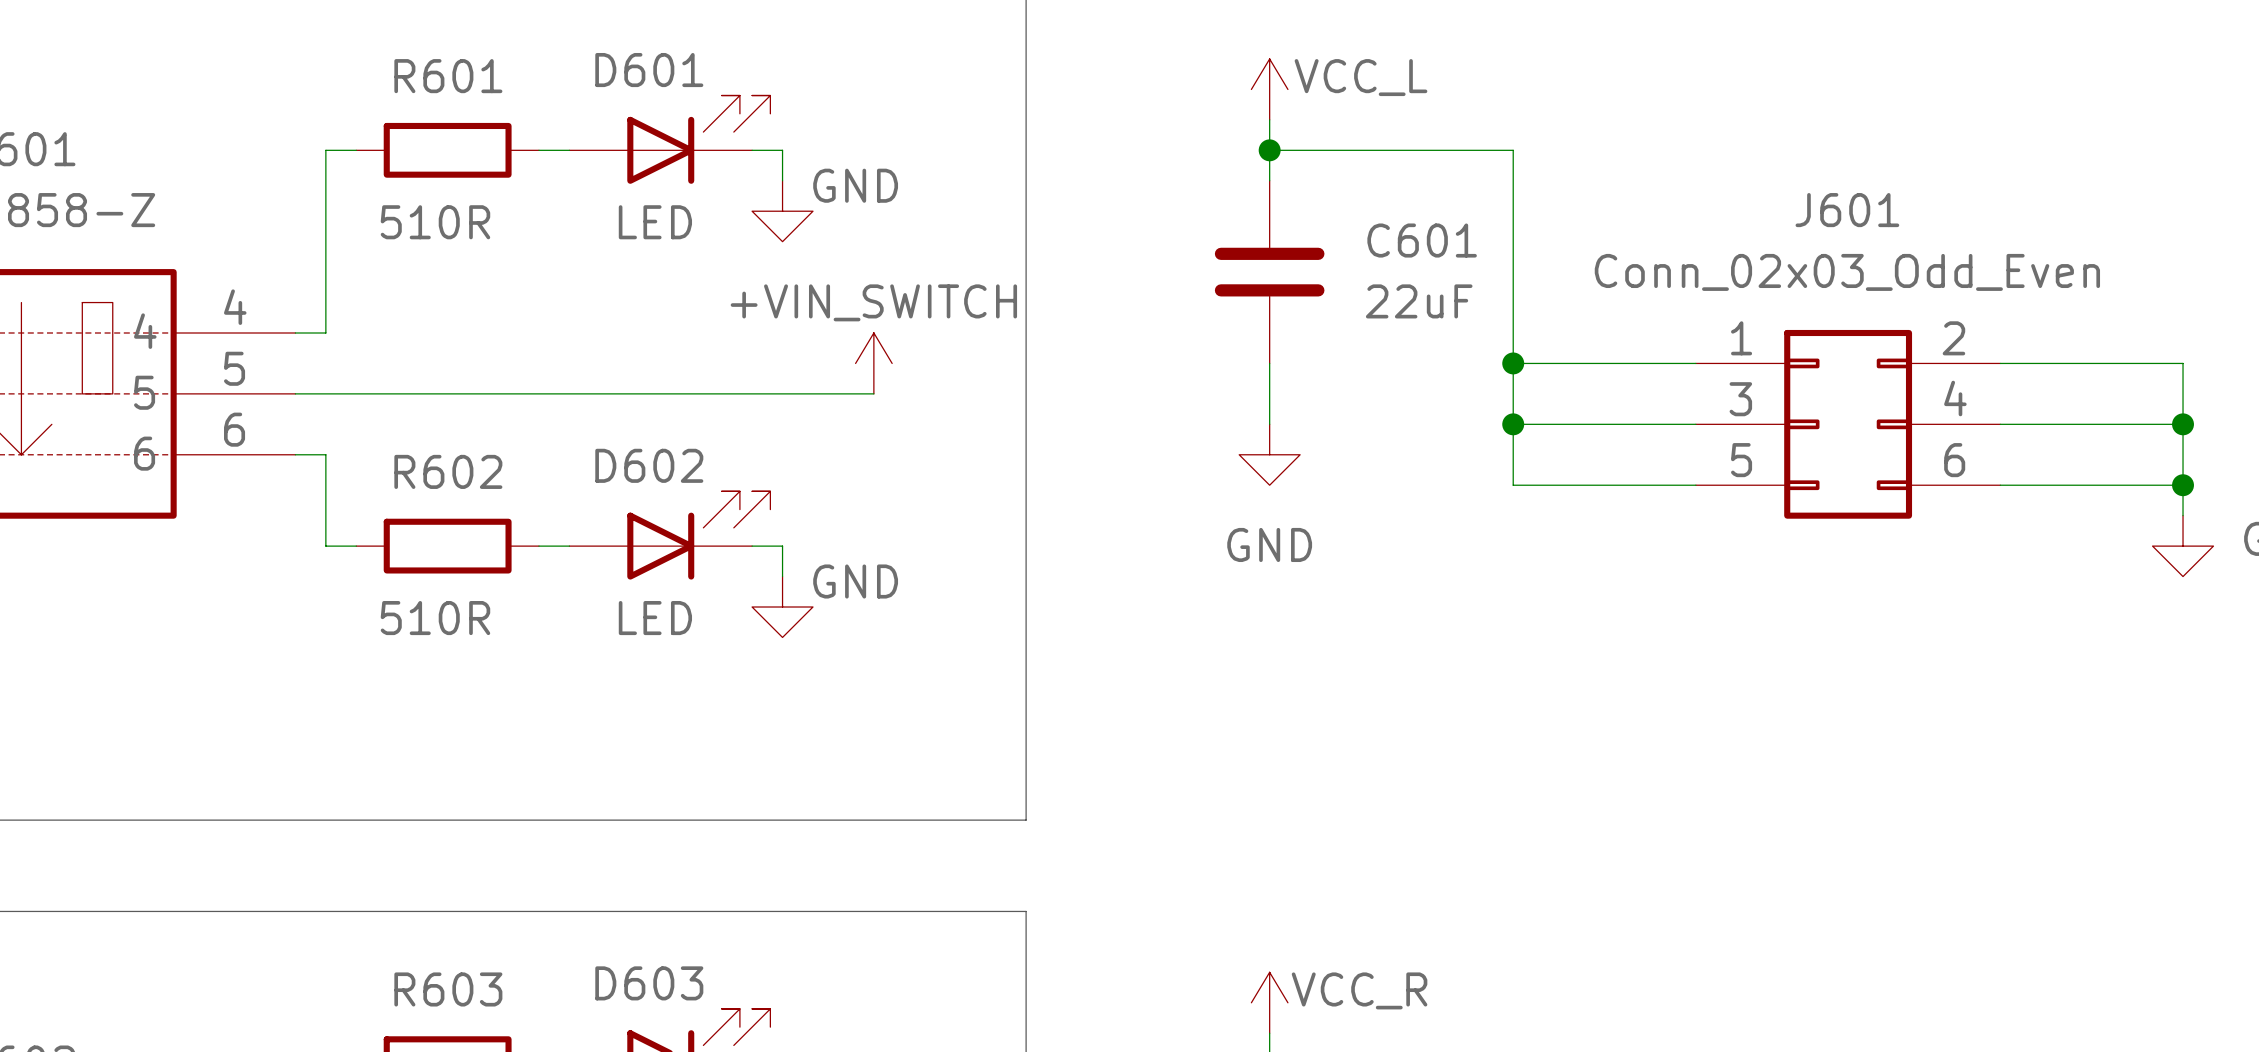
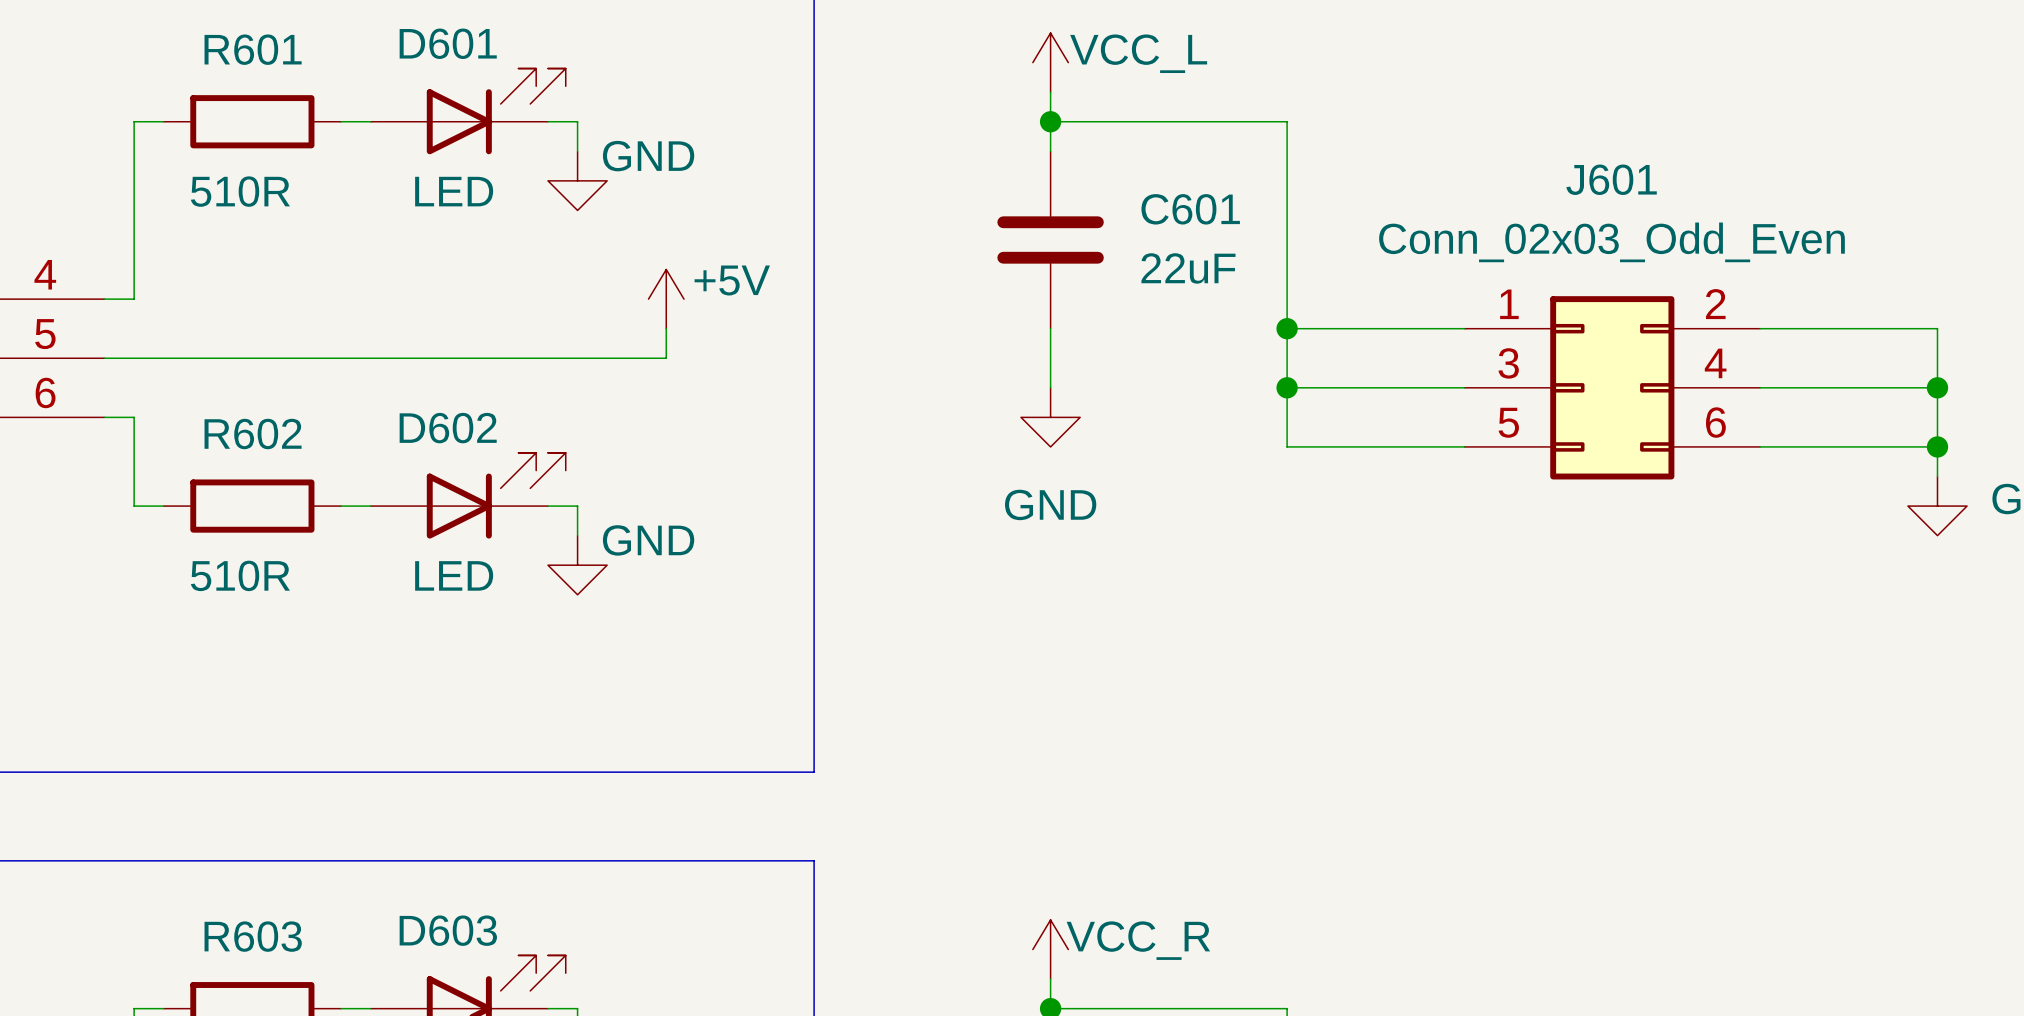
power symbol: none -> +5V (666, 299)
power symbol: +VIN_SWITCH (873, 363) -> none

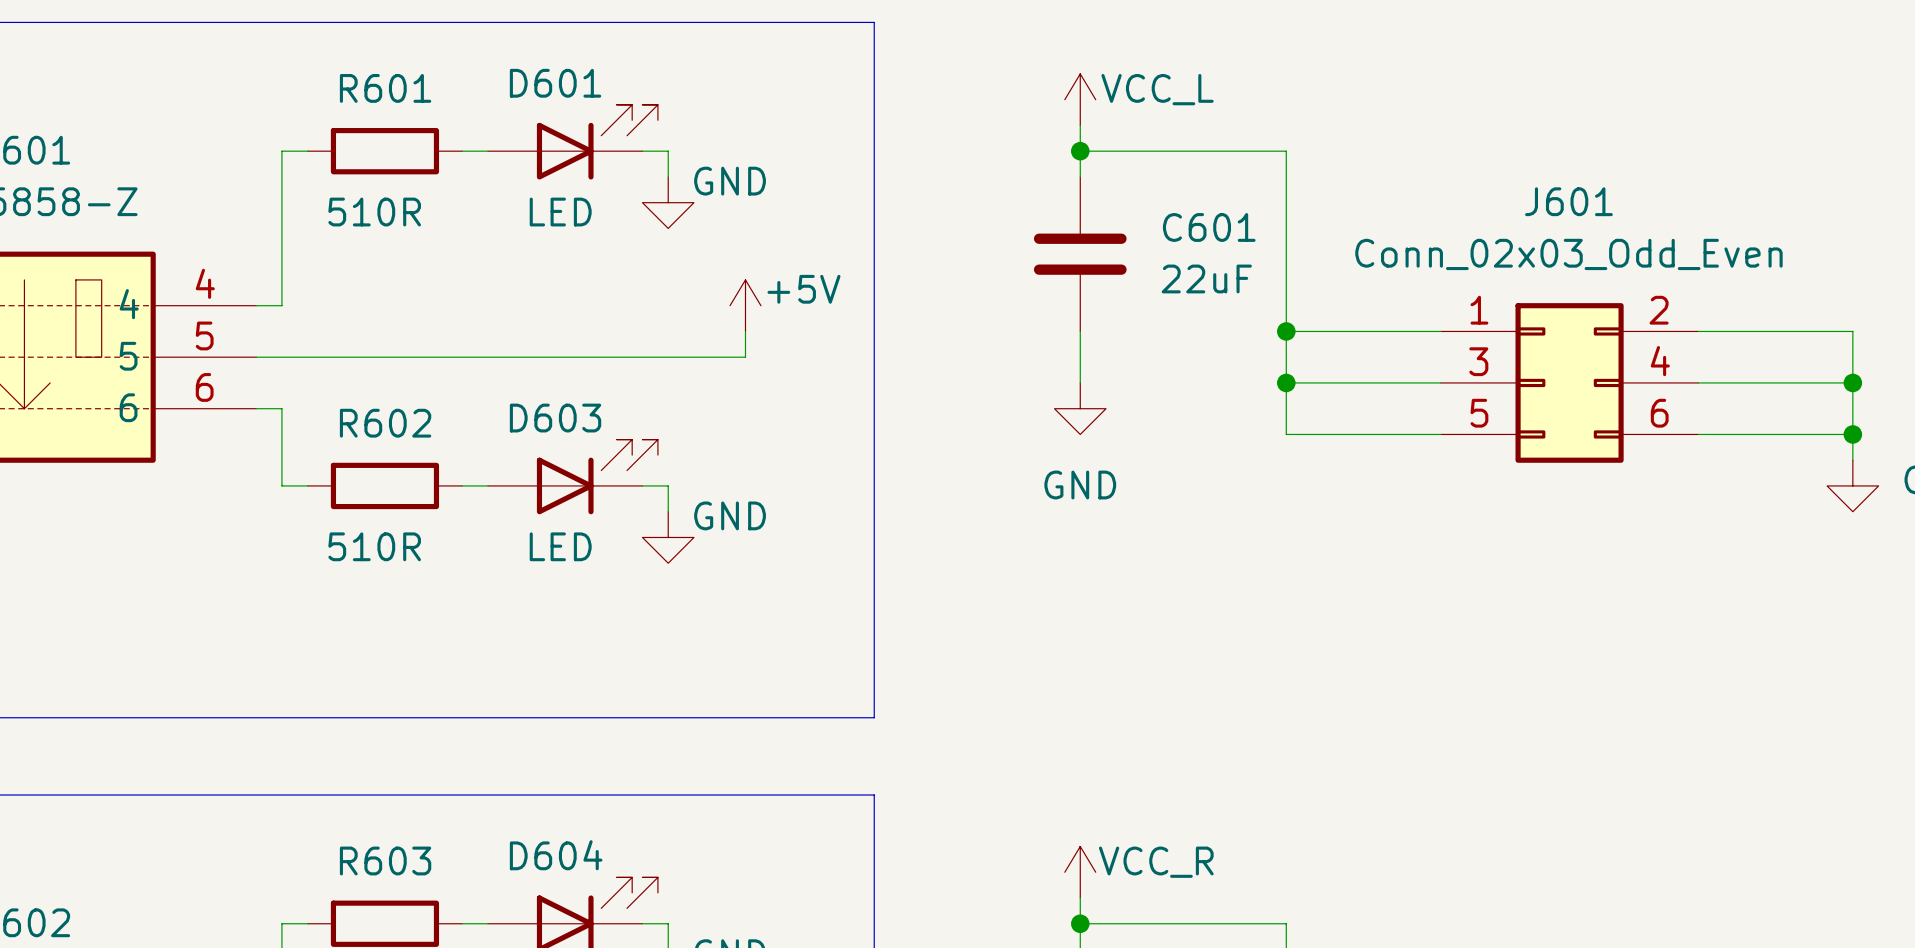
D602 name: D602 (448, 428) -> D603 (555, 418)
D603 name: D603 (448, 930) -> D604 (556, 855)

